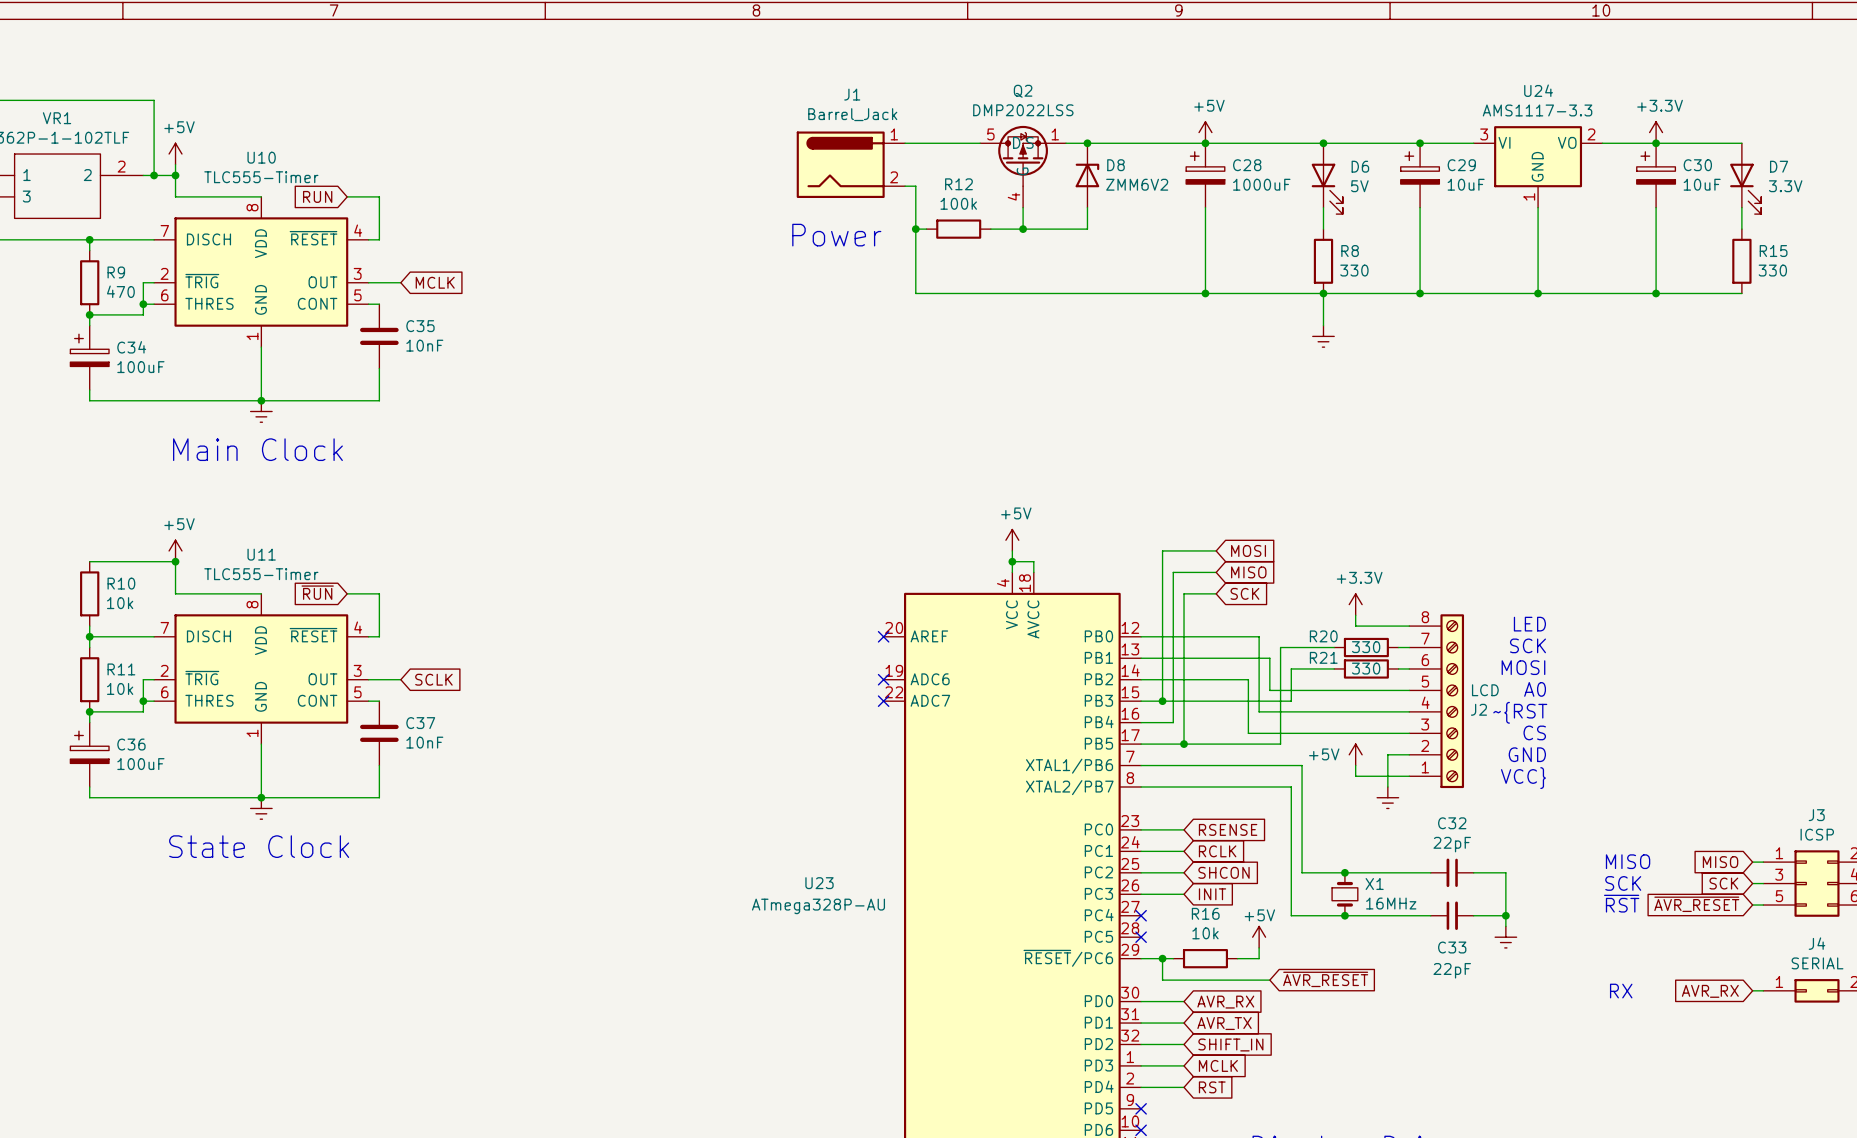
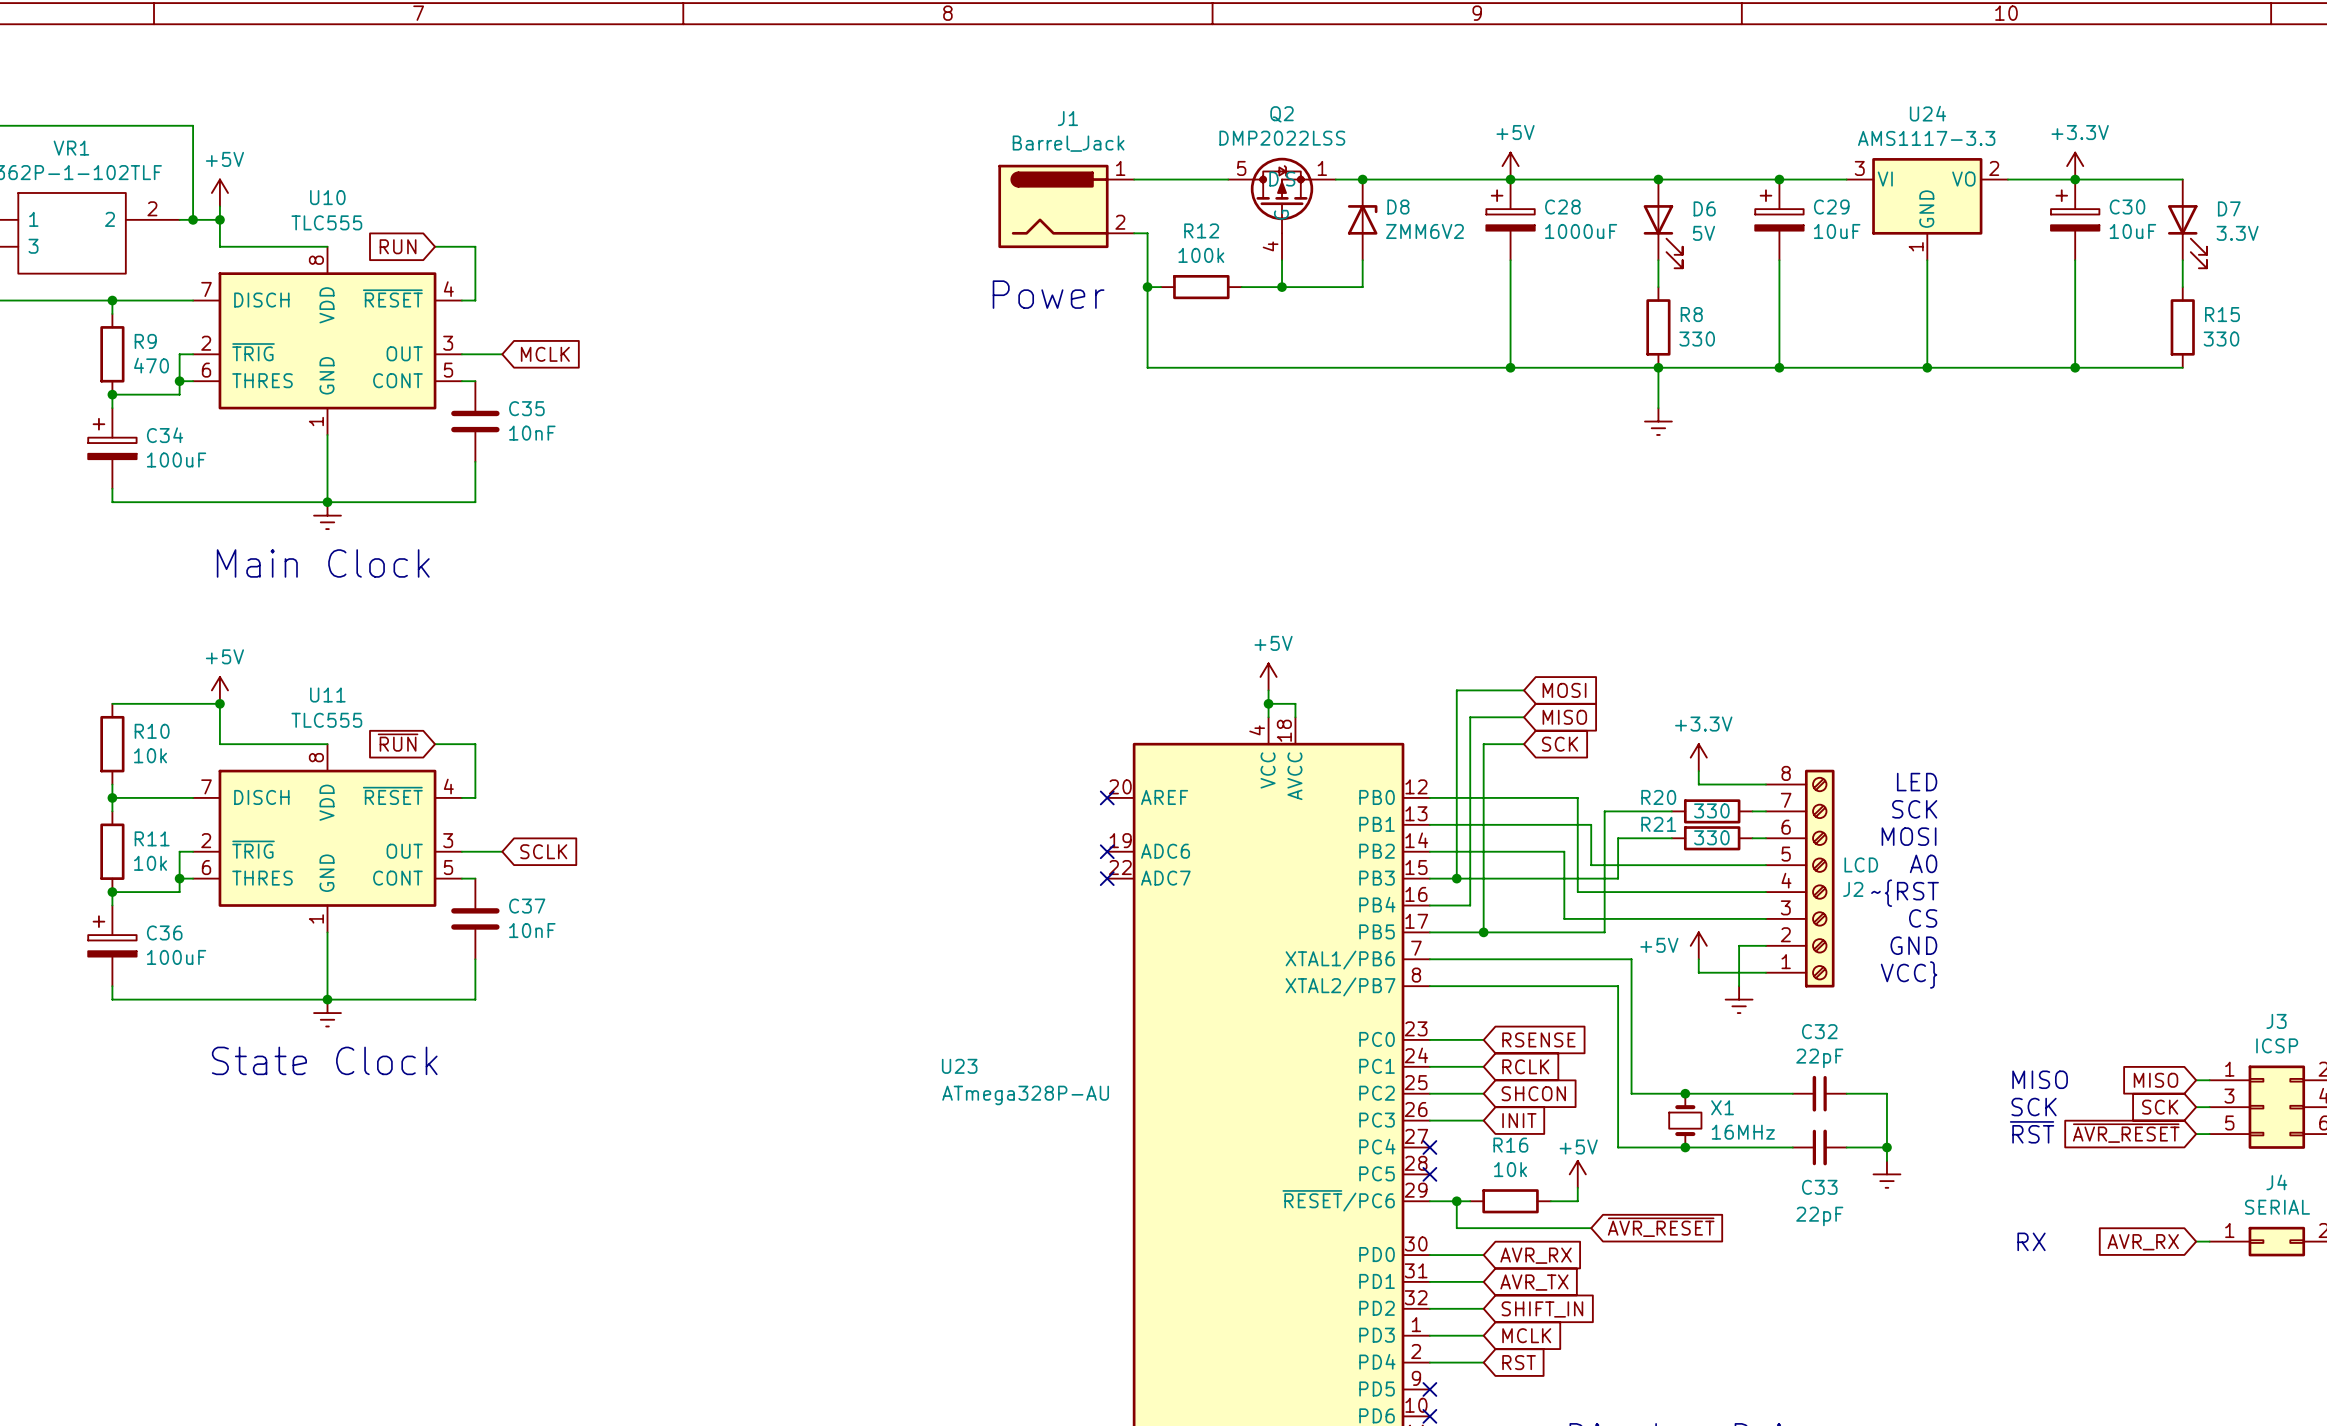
U10 value: TLC555-Timer (261, 177) -> TLC555 (326, 222)
U11 value: TLC555-Timer (261, 574) -> TLC555 (326, 720)
U23 name position: U23 (819, 883) -> U23 (959, 1066)
U23 value position: ATmega328P-AU (818, 906) -> ATmega328P-AU (1025, 1095)

